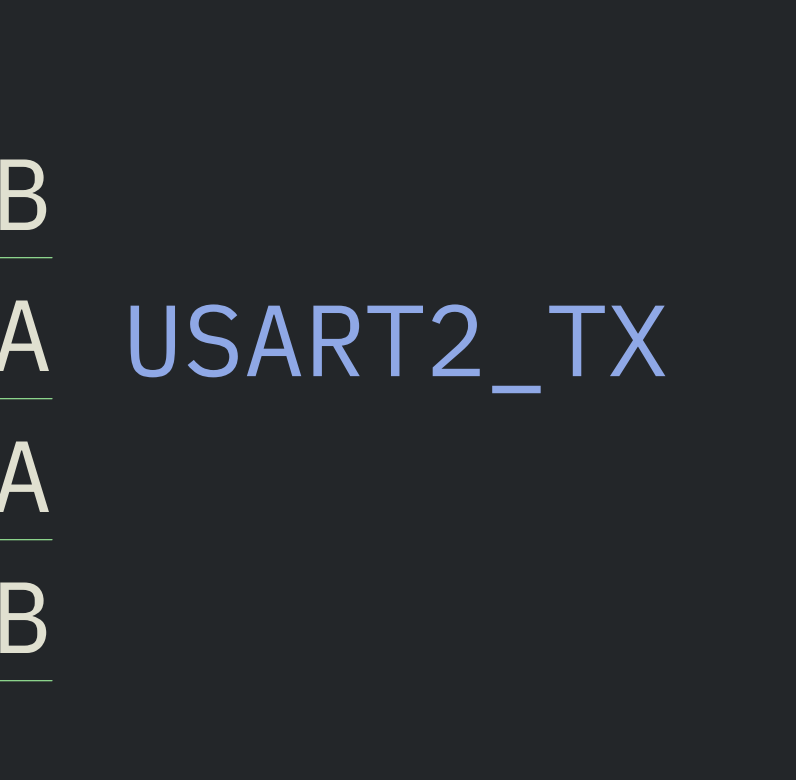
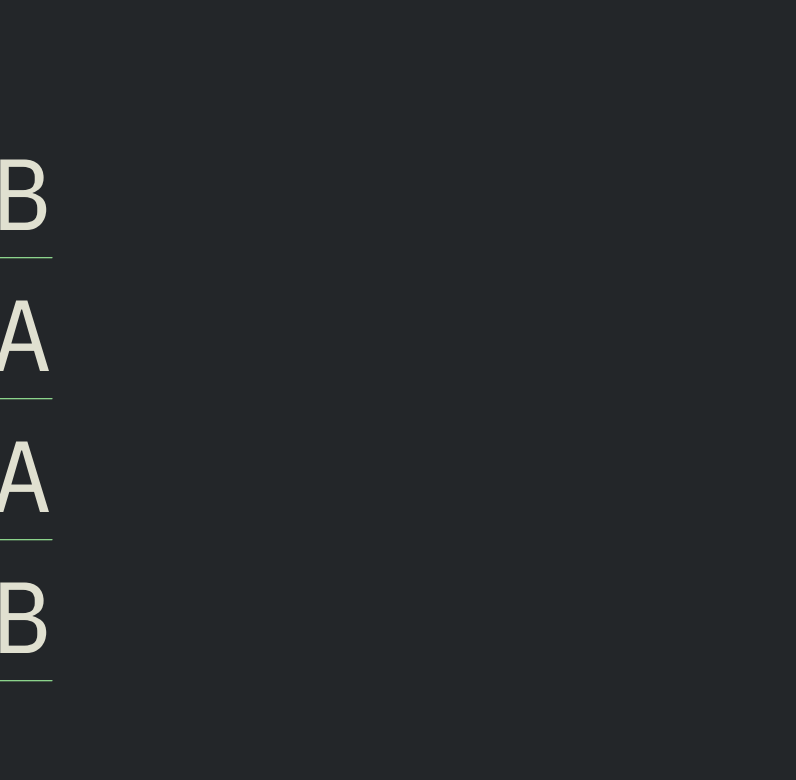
text: USART2_TX (397, 348) -> none

